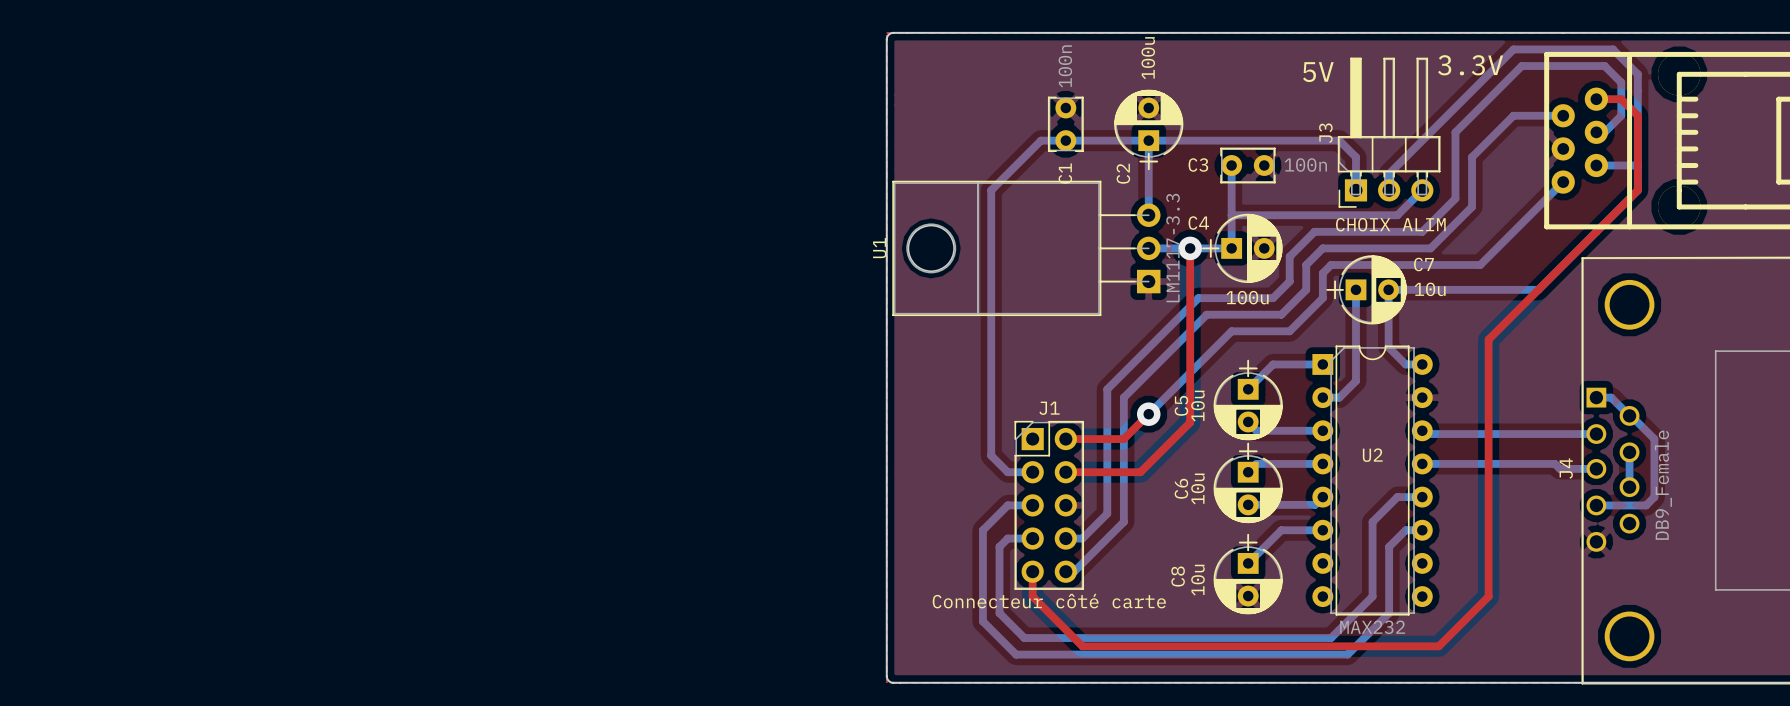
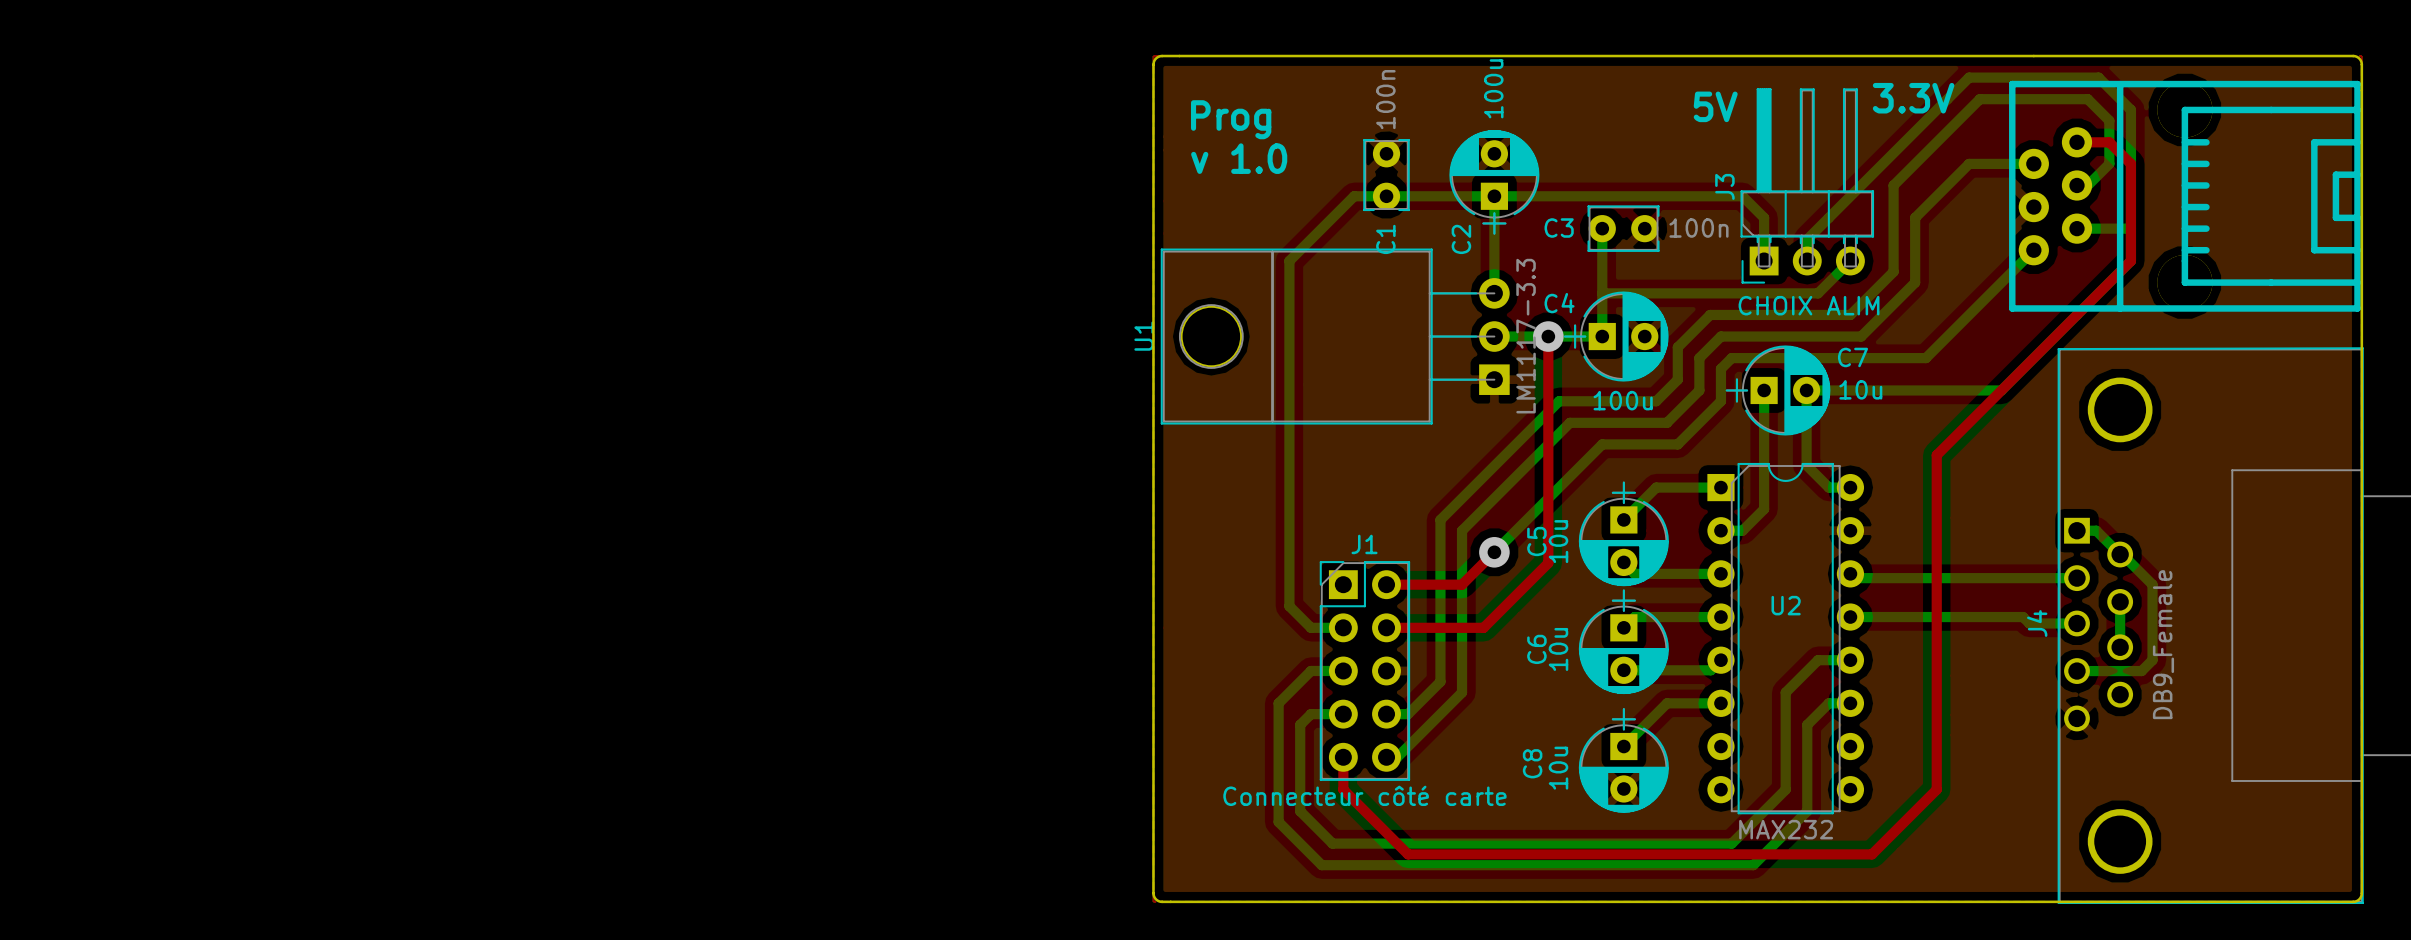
text: none -> Prog (1231, 119)
text: none -> v 1.0 (1239, 158)

